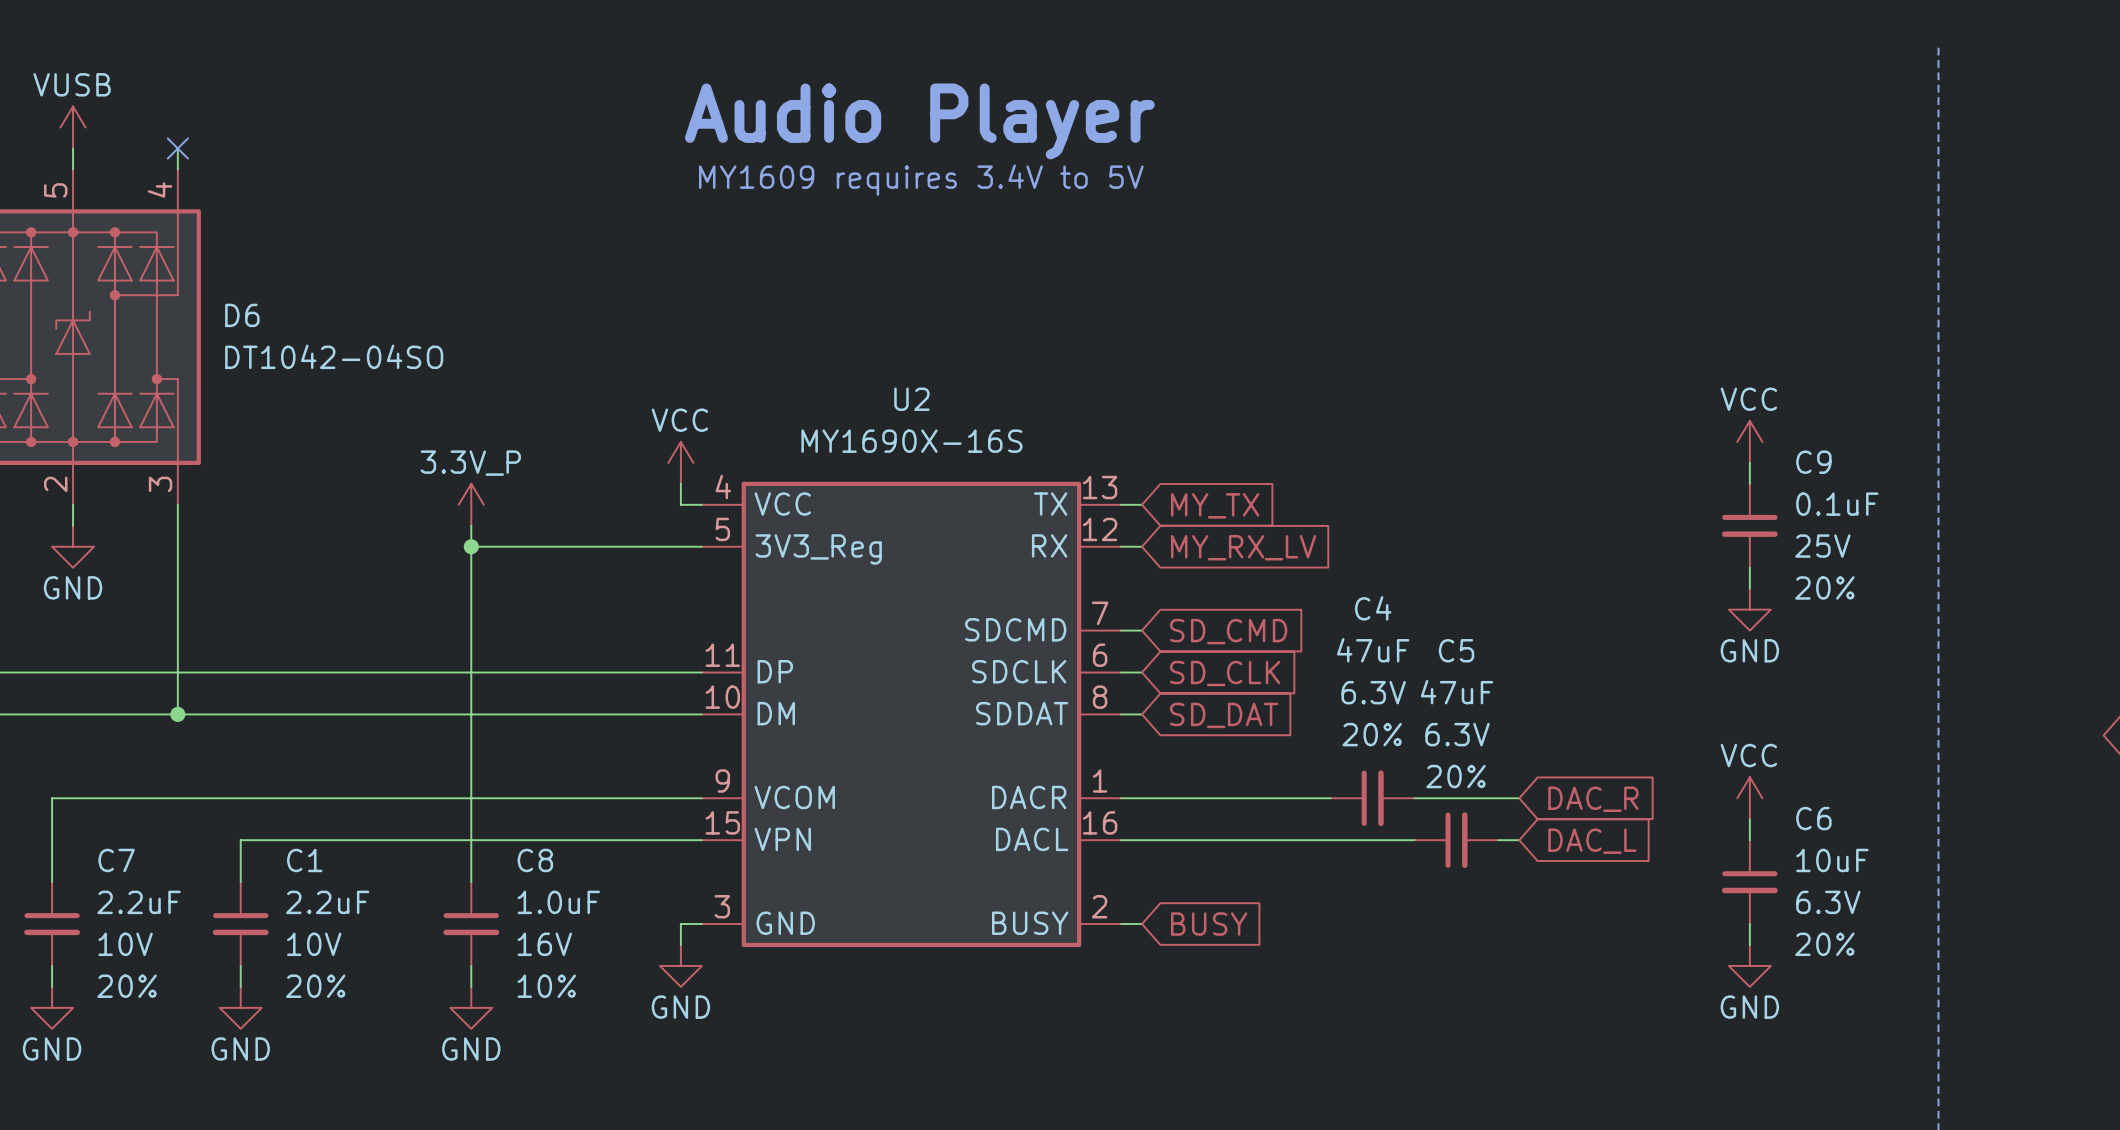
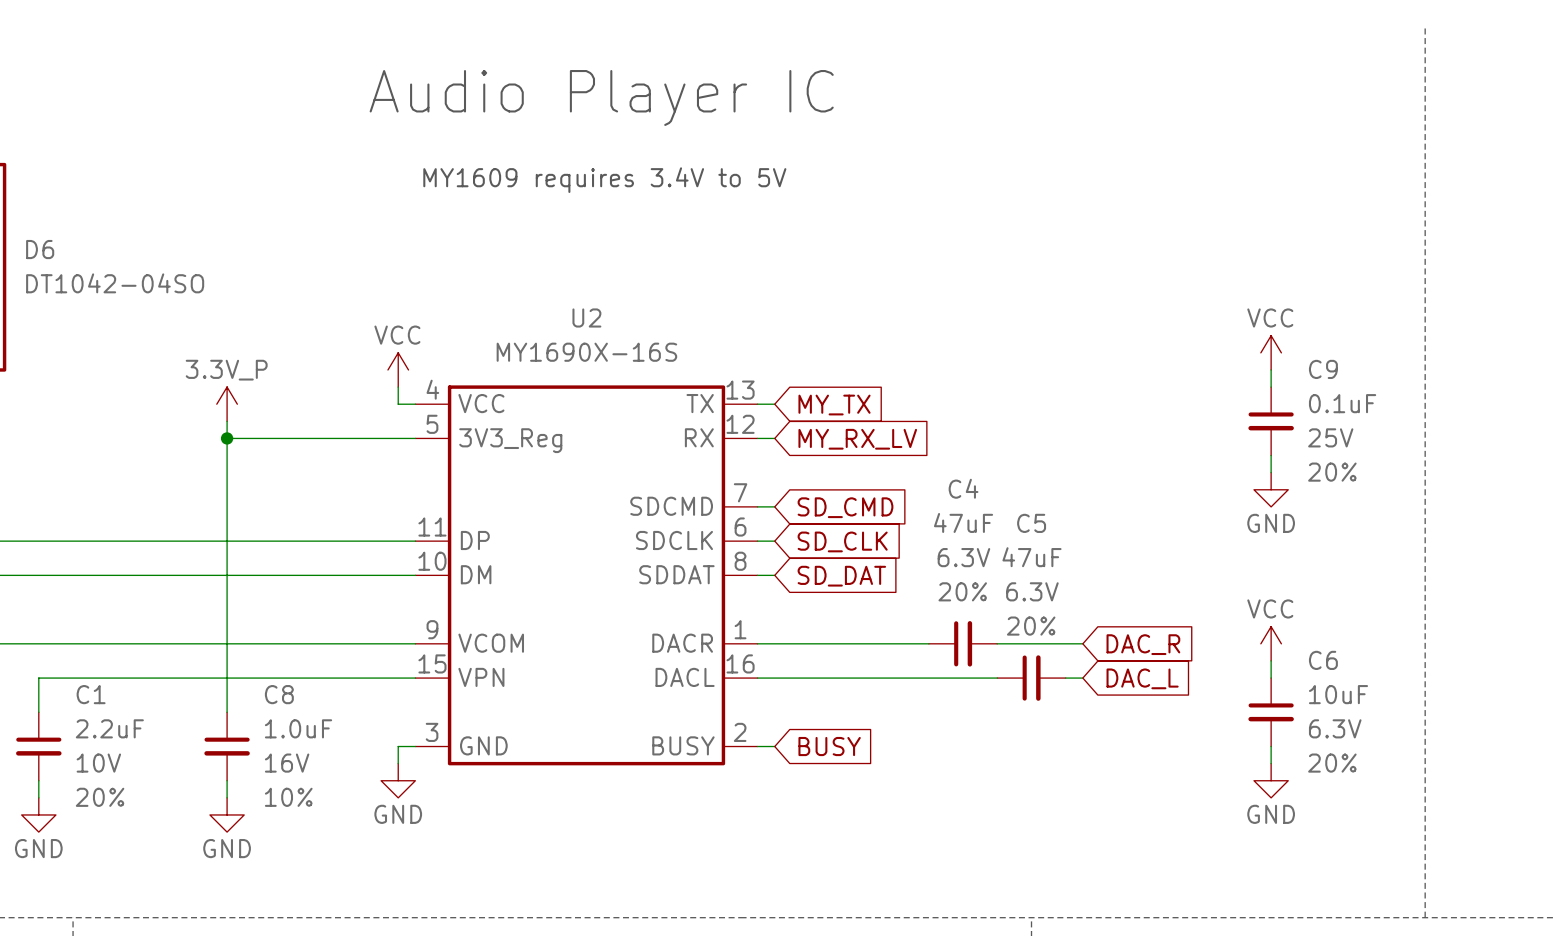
text: Audio Player (919, 121) -> Audio Player IC (601, 97)
text position: MY1609 requires 3.4V to 5V (921, 180) -> MY1609 requires 3.4V to 5V (604, 180)

